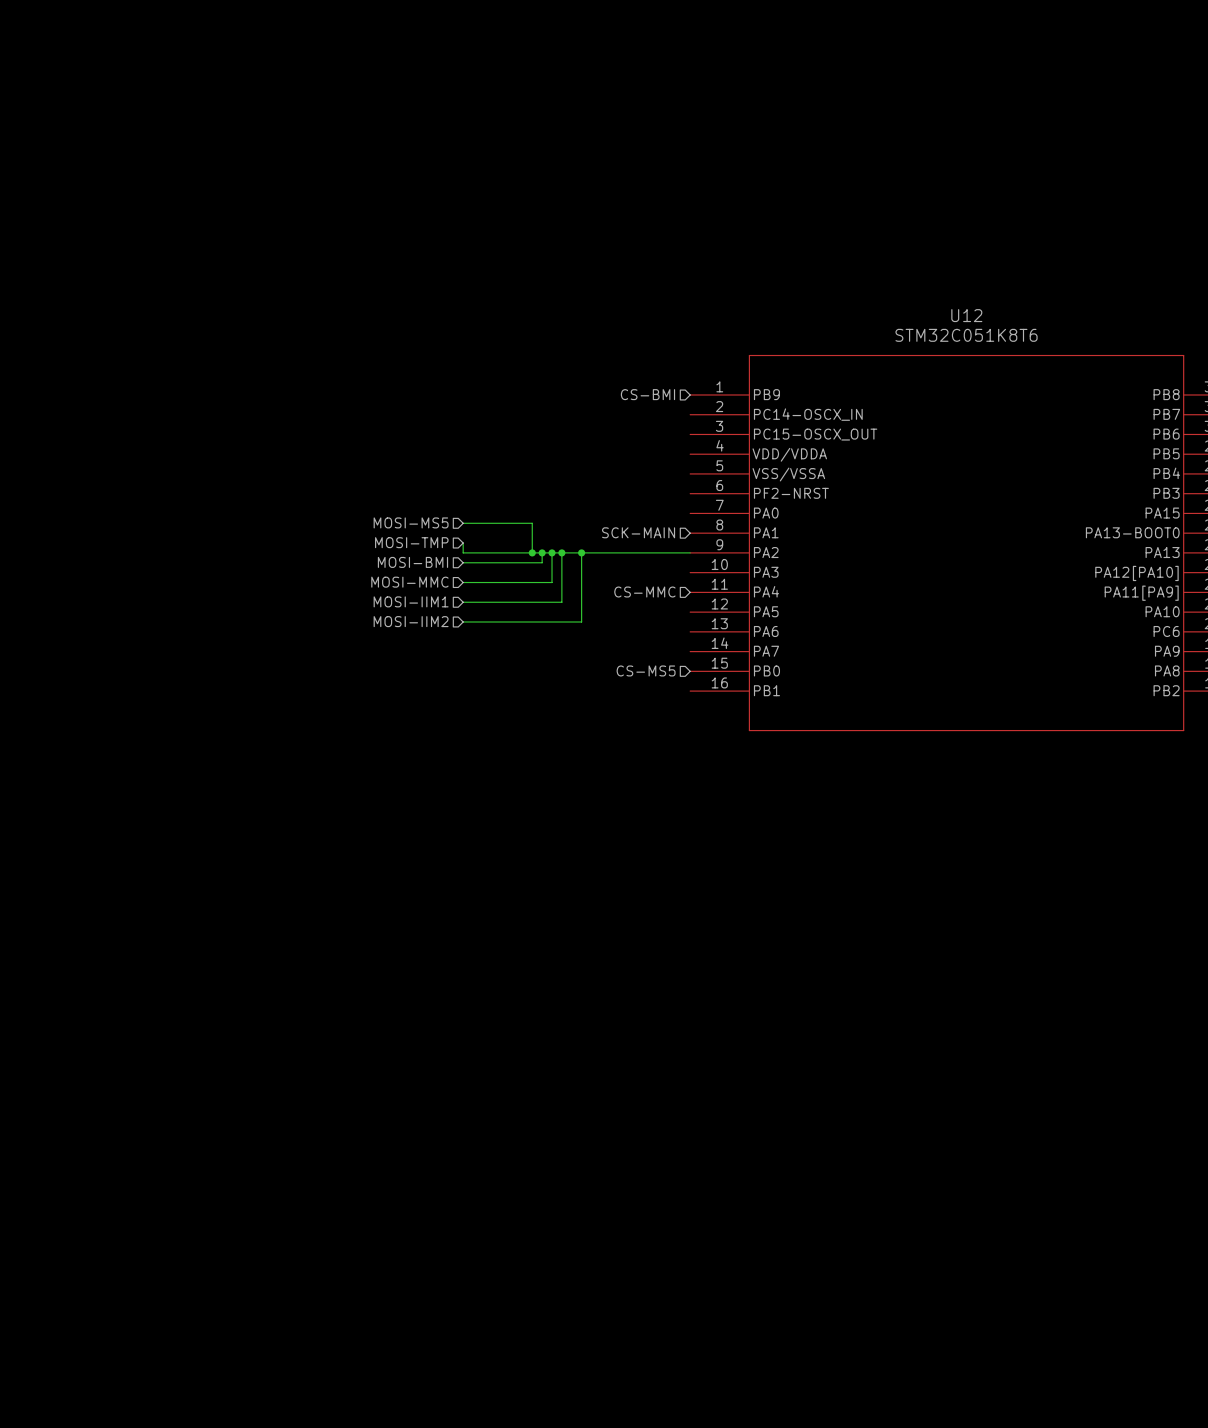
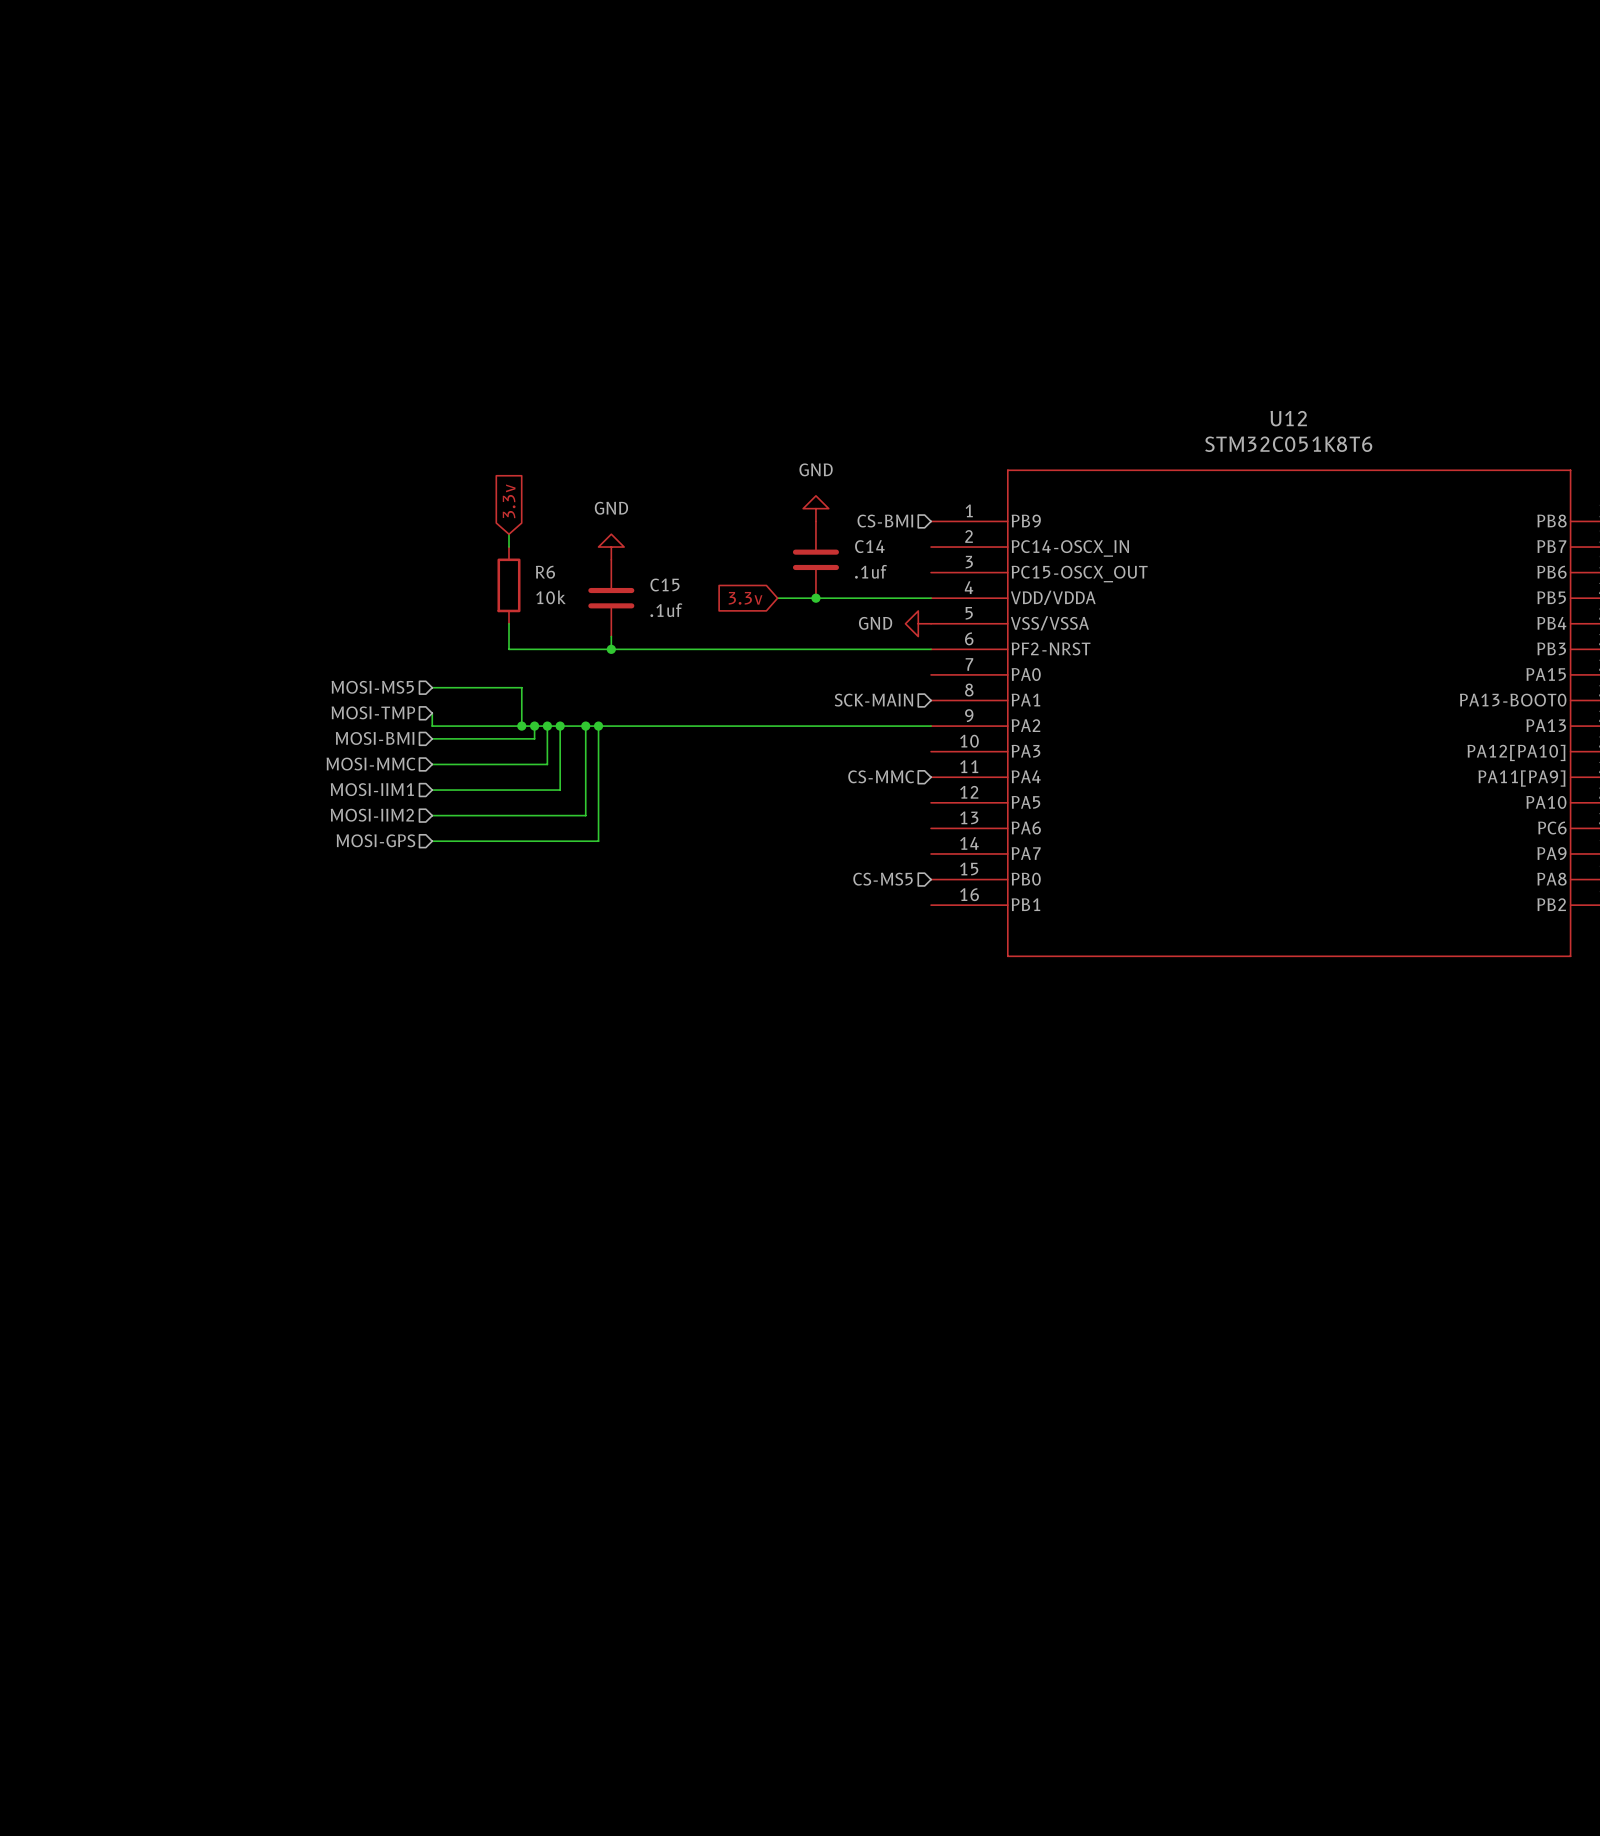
global label: none -> 3.3v (509, 501)
power symbol: none -> GND (815, 508)
wire: none -> (509, 534) (509, 547)
power symbol: none -> GND (611, 547)
C14: none -> .1uf (815, 559)
R6: none -> 10k (509, 585)
C15: none -> .1uf (611, 598)
global label: none -> 3.3v (745, 598)
wire: none -> (777, 598) (931, 598)
junction: none -> (815, 598)
wire: none -> (509, 623) (509, 649) (931, 649)
power symbol: none -> GND (918, 623)
wire: none -> (611, 636) (611, 649)
junction: none -> (611, 649)
hierarchical label position: MOSI-MS5 (411, 522) -> MOSI-MS5 (372, 687)
wire: (463, 523) (532, 523) (532, 552) -> (432, 687) (521, 687) (521, 726)
hierarchical label position: MOSI-TMP (411, 542) -> MOSI-TMP (373, 712)
wire: (463, 543) (463, 552) -> (432, 713) (432, 726) (636, 726)
junction: none -> (521, 726)
junction: none -> (534, 726)
junction: none -> (547, 726)
junction: none -> (560, 726)
junction: none -> (585, 726)
wire: none -> (598, 726) (598, 841) (432, 841)
junction: none -> (598, 726)
junction: (532, 552) -> none
wire: (542, 552) (542, 562) (463, 562) -> (534, 726) (534, 738) (432, 738)
junction: (542, 552) -> none
wire: (552, 552) (552, 582) (463, 582) -> (547, 726) (547, 764) (432, 764)
junction: (552, 552) -> none
wire: (561, 552) (561, 602) (463, 602) -> (560, 726) (560, 790) (432, 790)
junction: (561, 552) -> none
wire: (581, 552) (581, 621) (463, 621) -> (585, 726) (585, 815) (432, 815)
junction: (581, 552) -> none
hierarchical label position: MOSI-BMI (412, 562) -> MOSI-BMI (375, 738)
hierarchical label position: MOSI-MMC (409, 582) -> MOSI-MMC (370, 764)
hierarchical label position: MOSI-IIM1 (411, 601) -> MOSI-IIM1 (372, 789)
hierarchical label position: MOSI-IIM2 (411, 621) -> MOSI-IIM2 (372, 815)
hierarchical label: none -> MOSI-GPS (375, 840)

